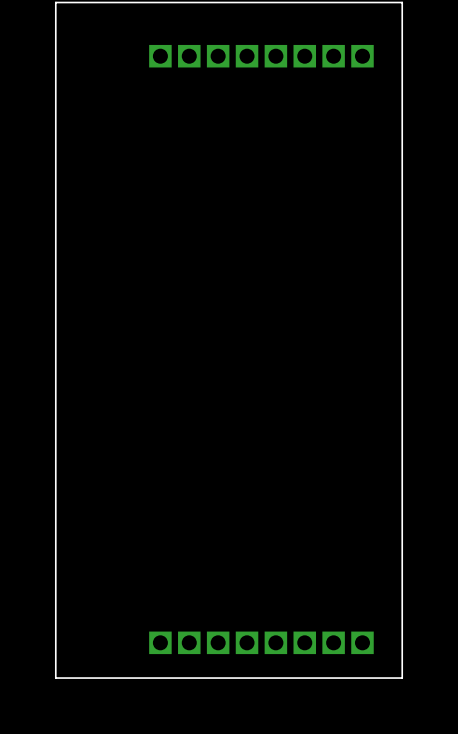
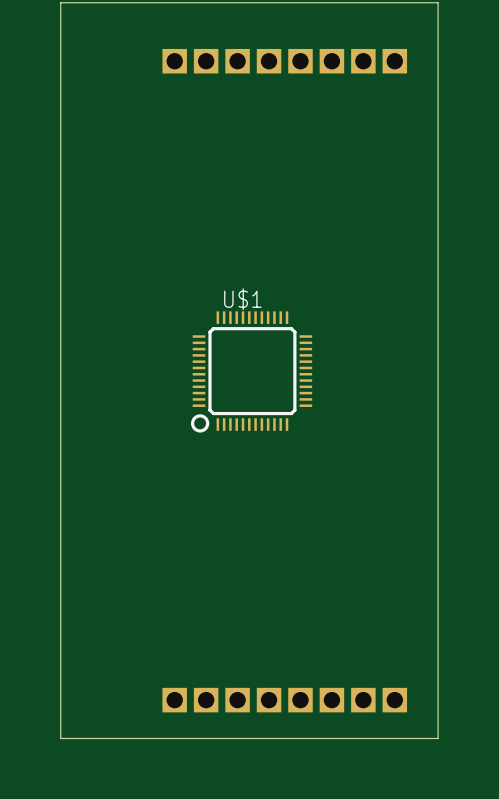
U$1: none -> (251, 371)

